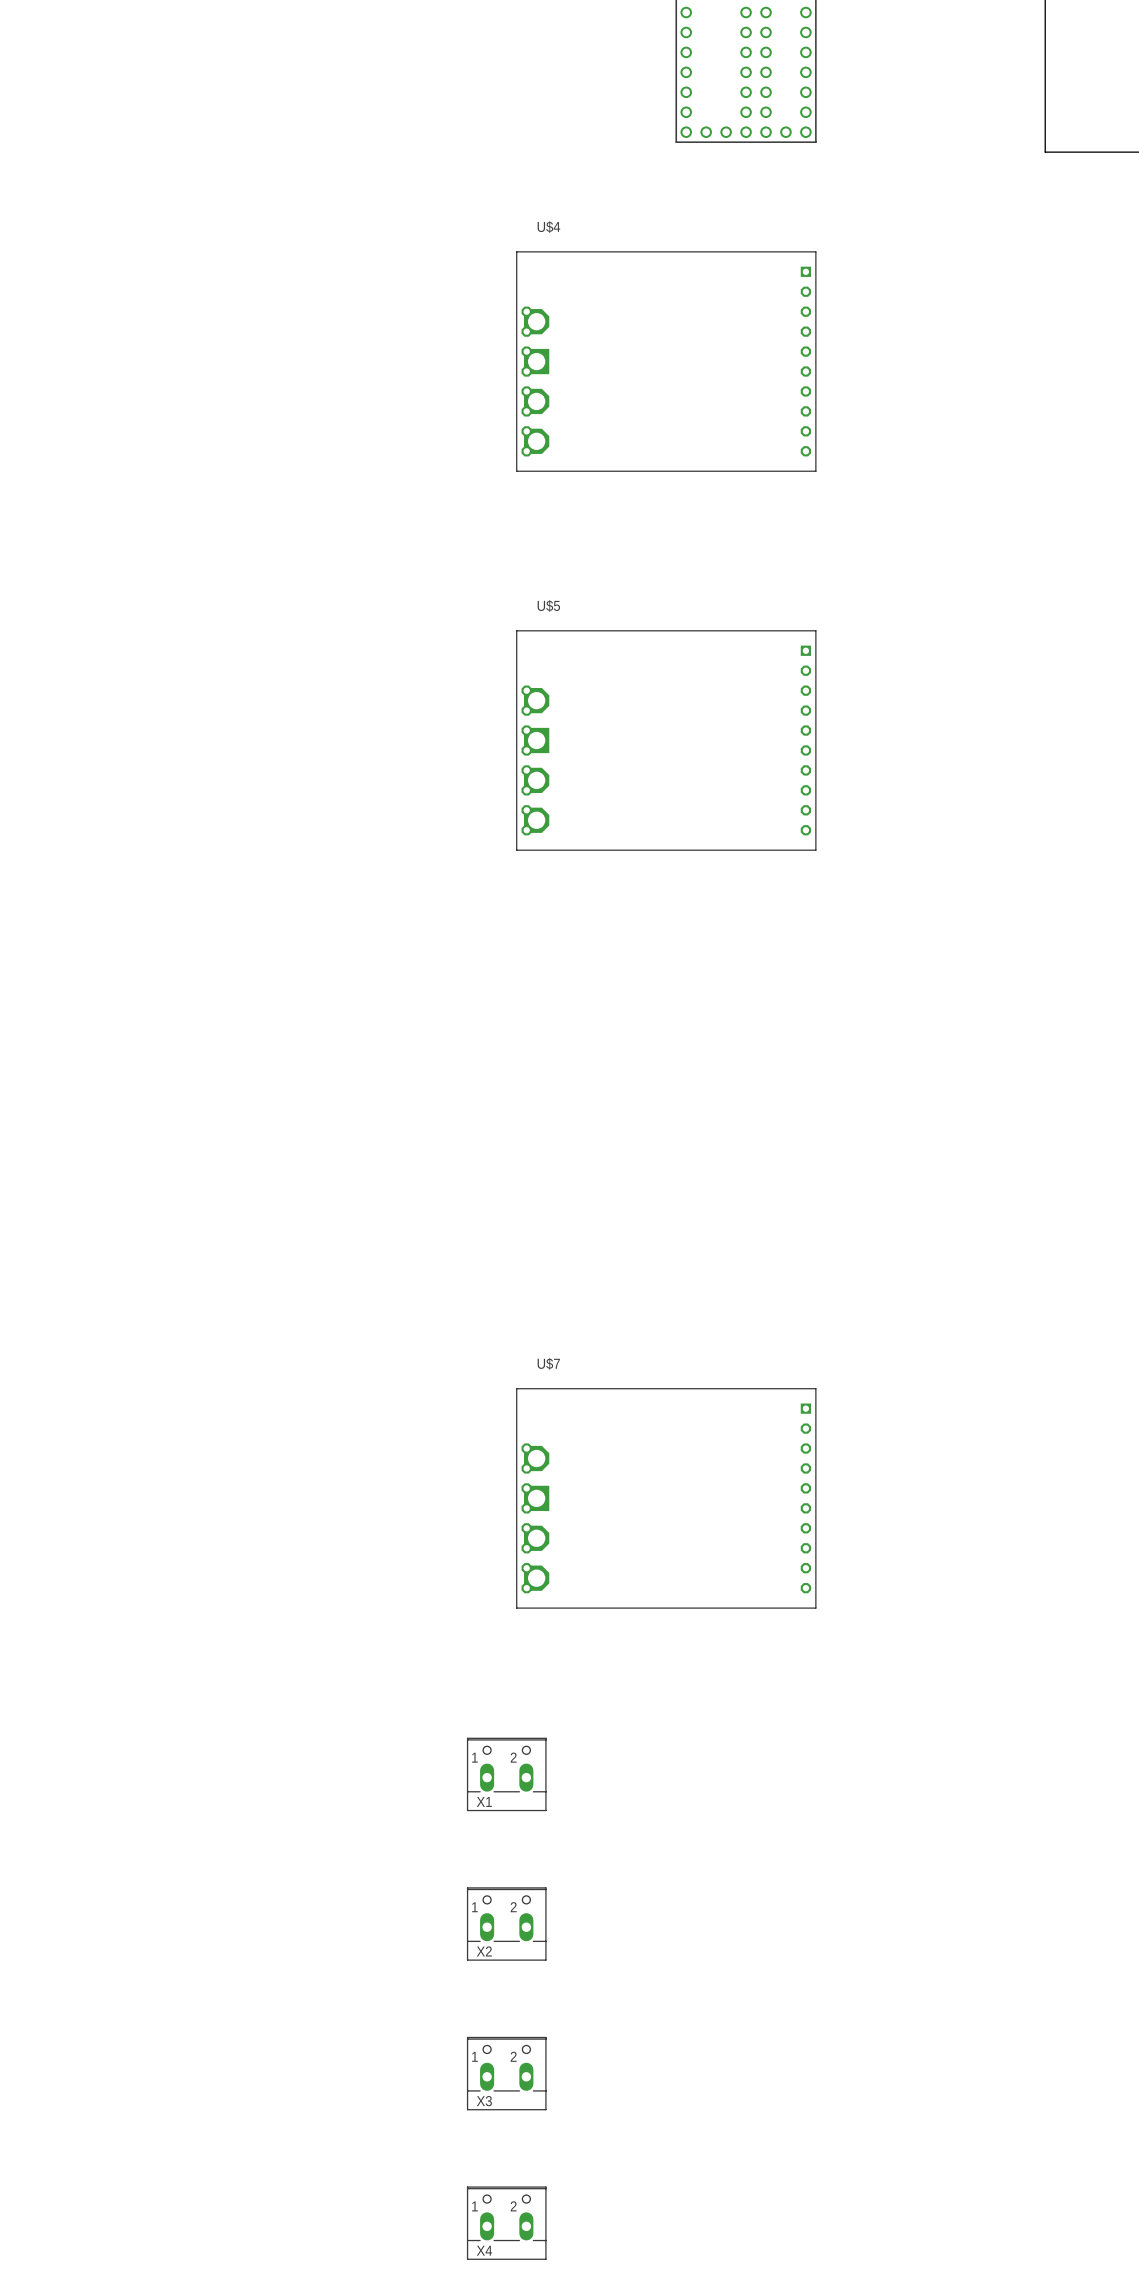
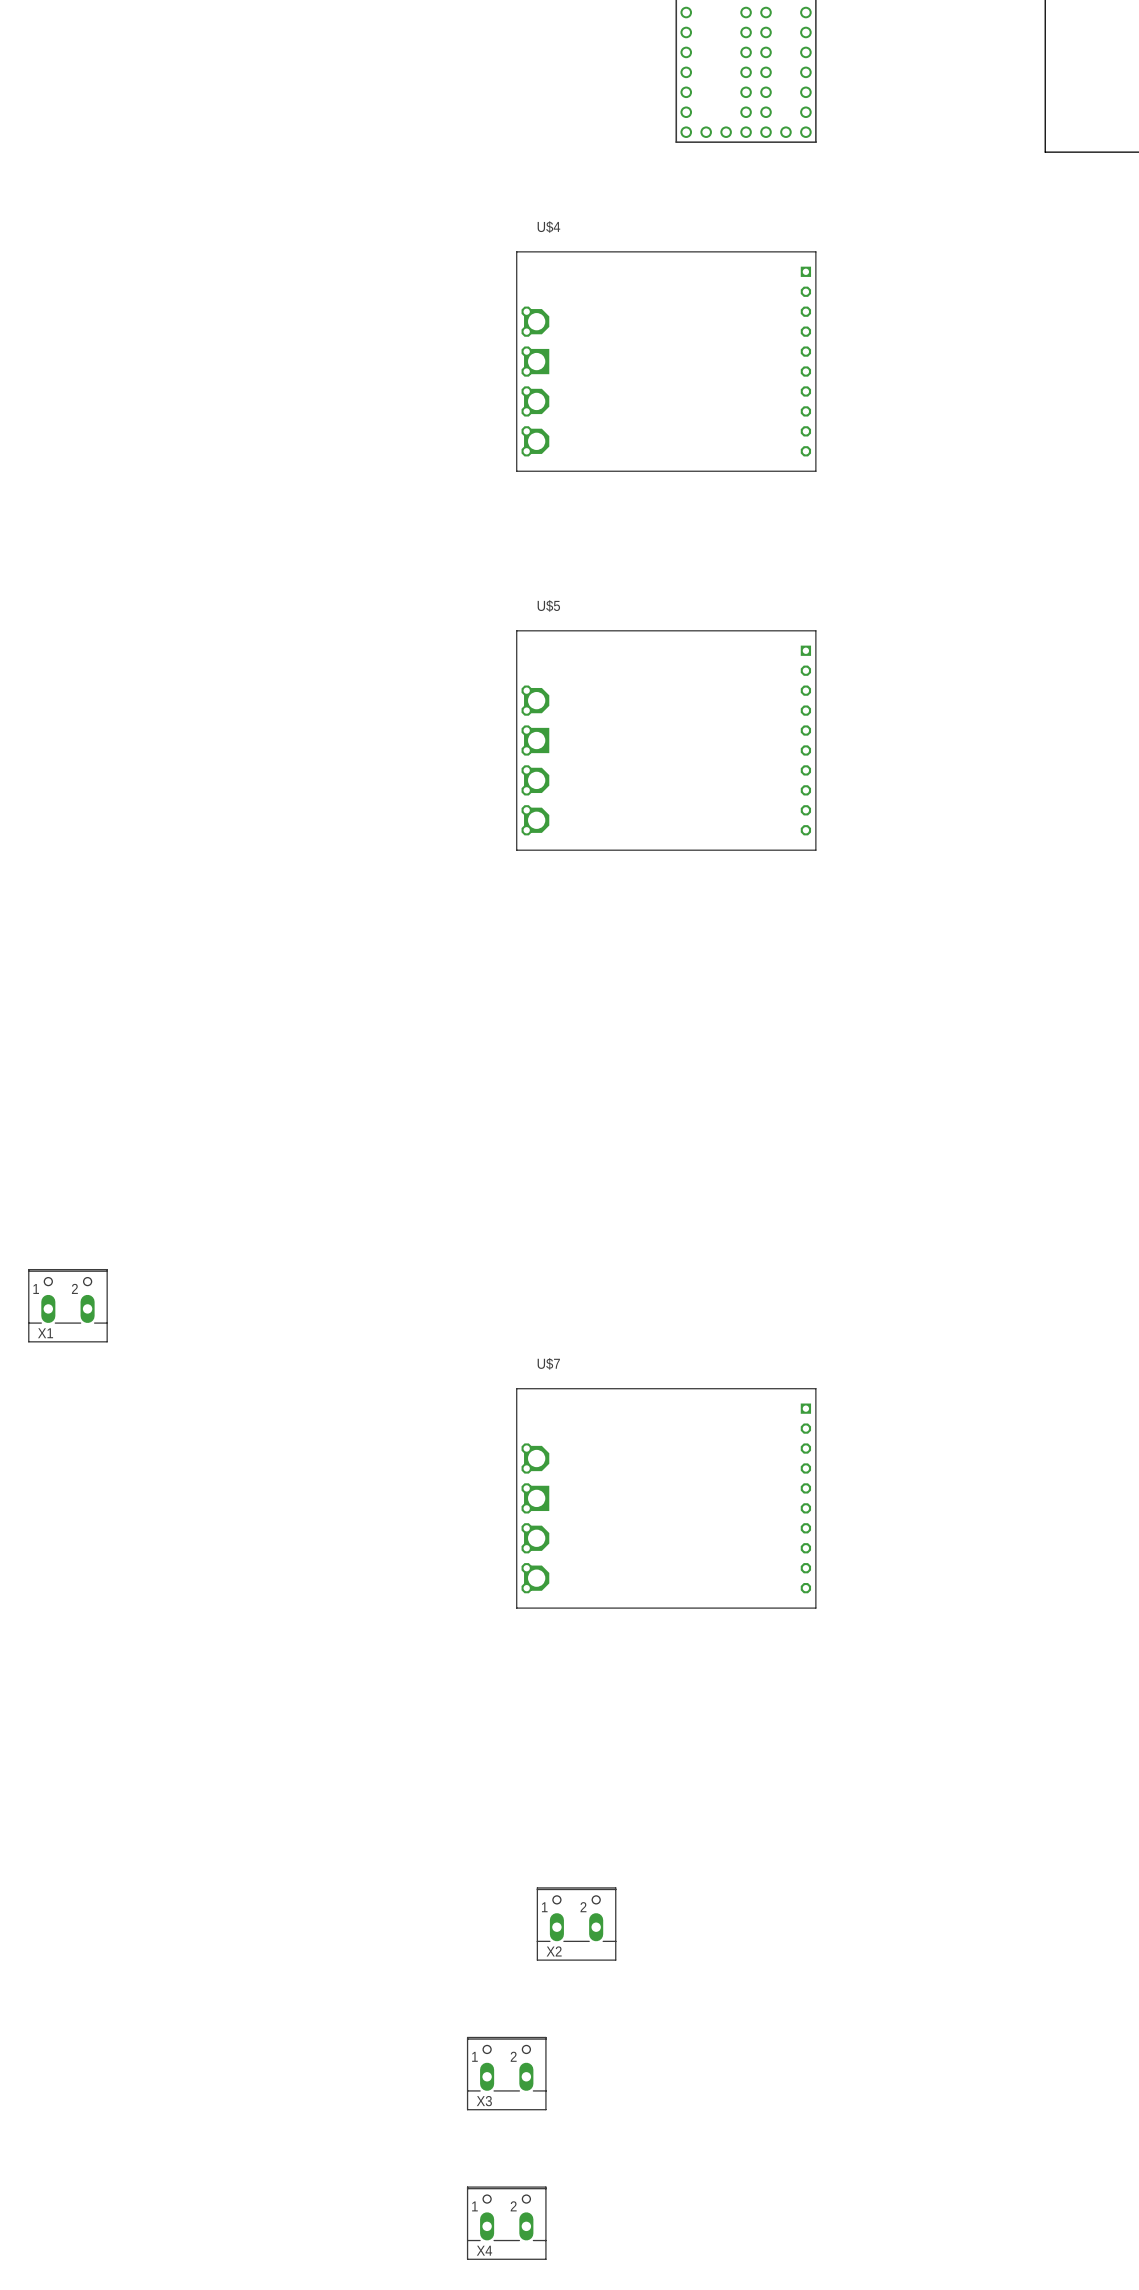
X1 position: (506, 1774) -> (67, 1305)
X2 position: (506, 1924) -> (576, 1924)

